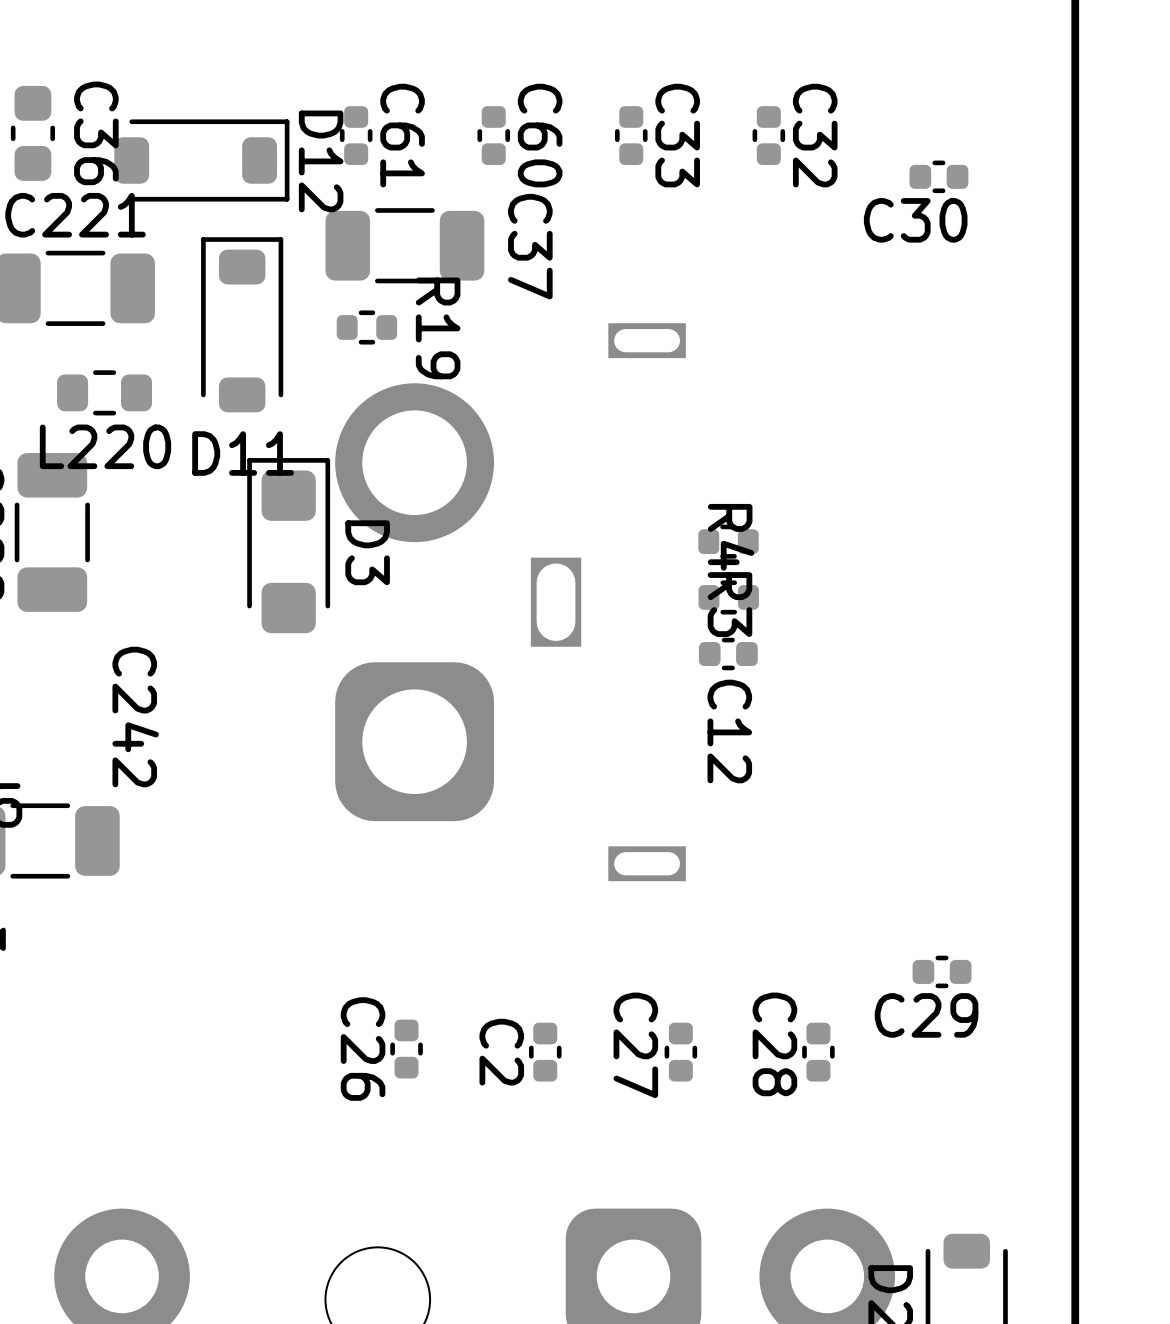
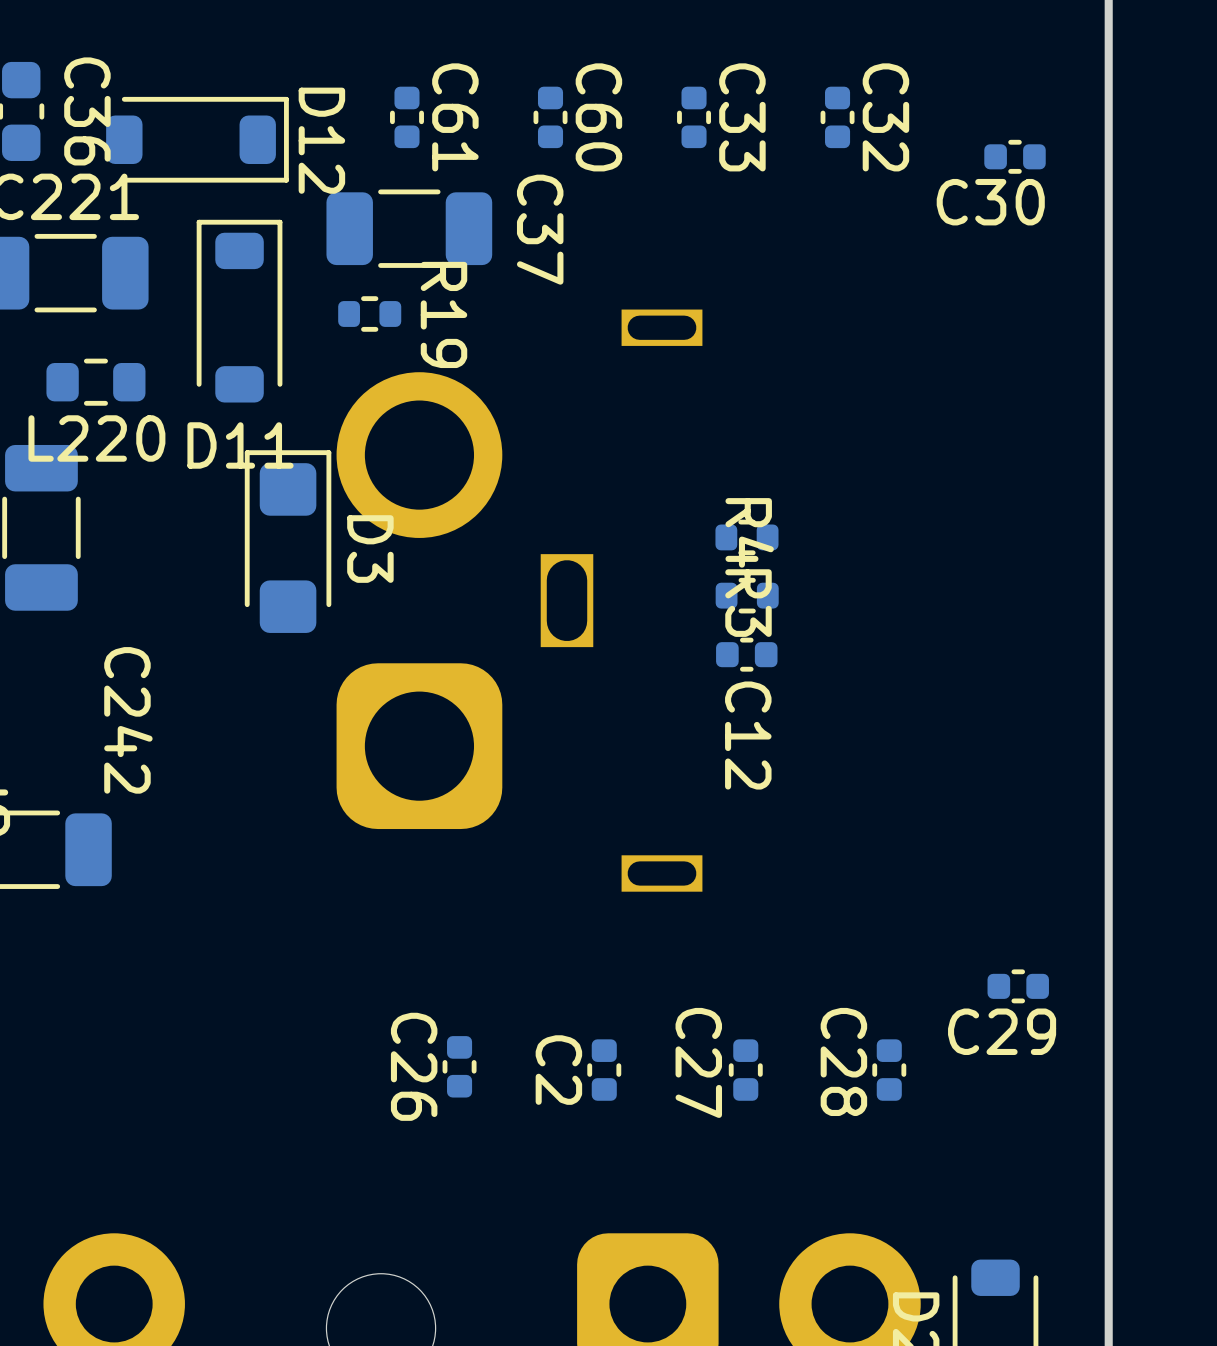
C61 position: (356, 135) -> (406, 117)
C60 position: (493, 135) -> (550, 117)
C33 position: (631, 135) -> (694, 117)
C32 position: (768, 135) -> (837, 117)
C30 position: (938, 176) -> (1015, 156)
C29 position: (942, 971) -> (1018, 986)
C26 position: (406, 1049) -> (459, 1066)
C2 position: (545, 1052) -> (604, 1070)
C27 position: (680, 1052) -> (745, 1070)
C28 position: (818, 1052) -> (889, 1070)

